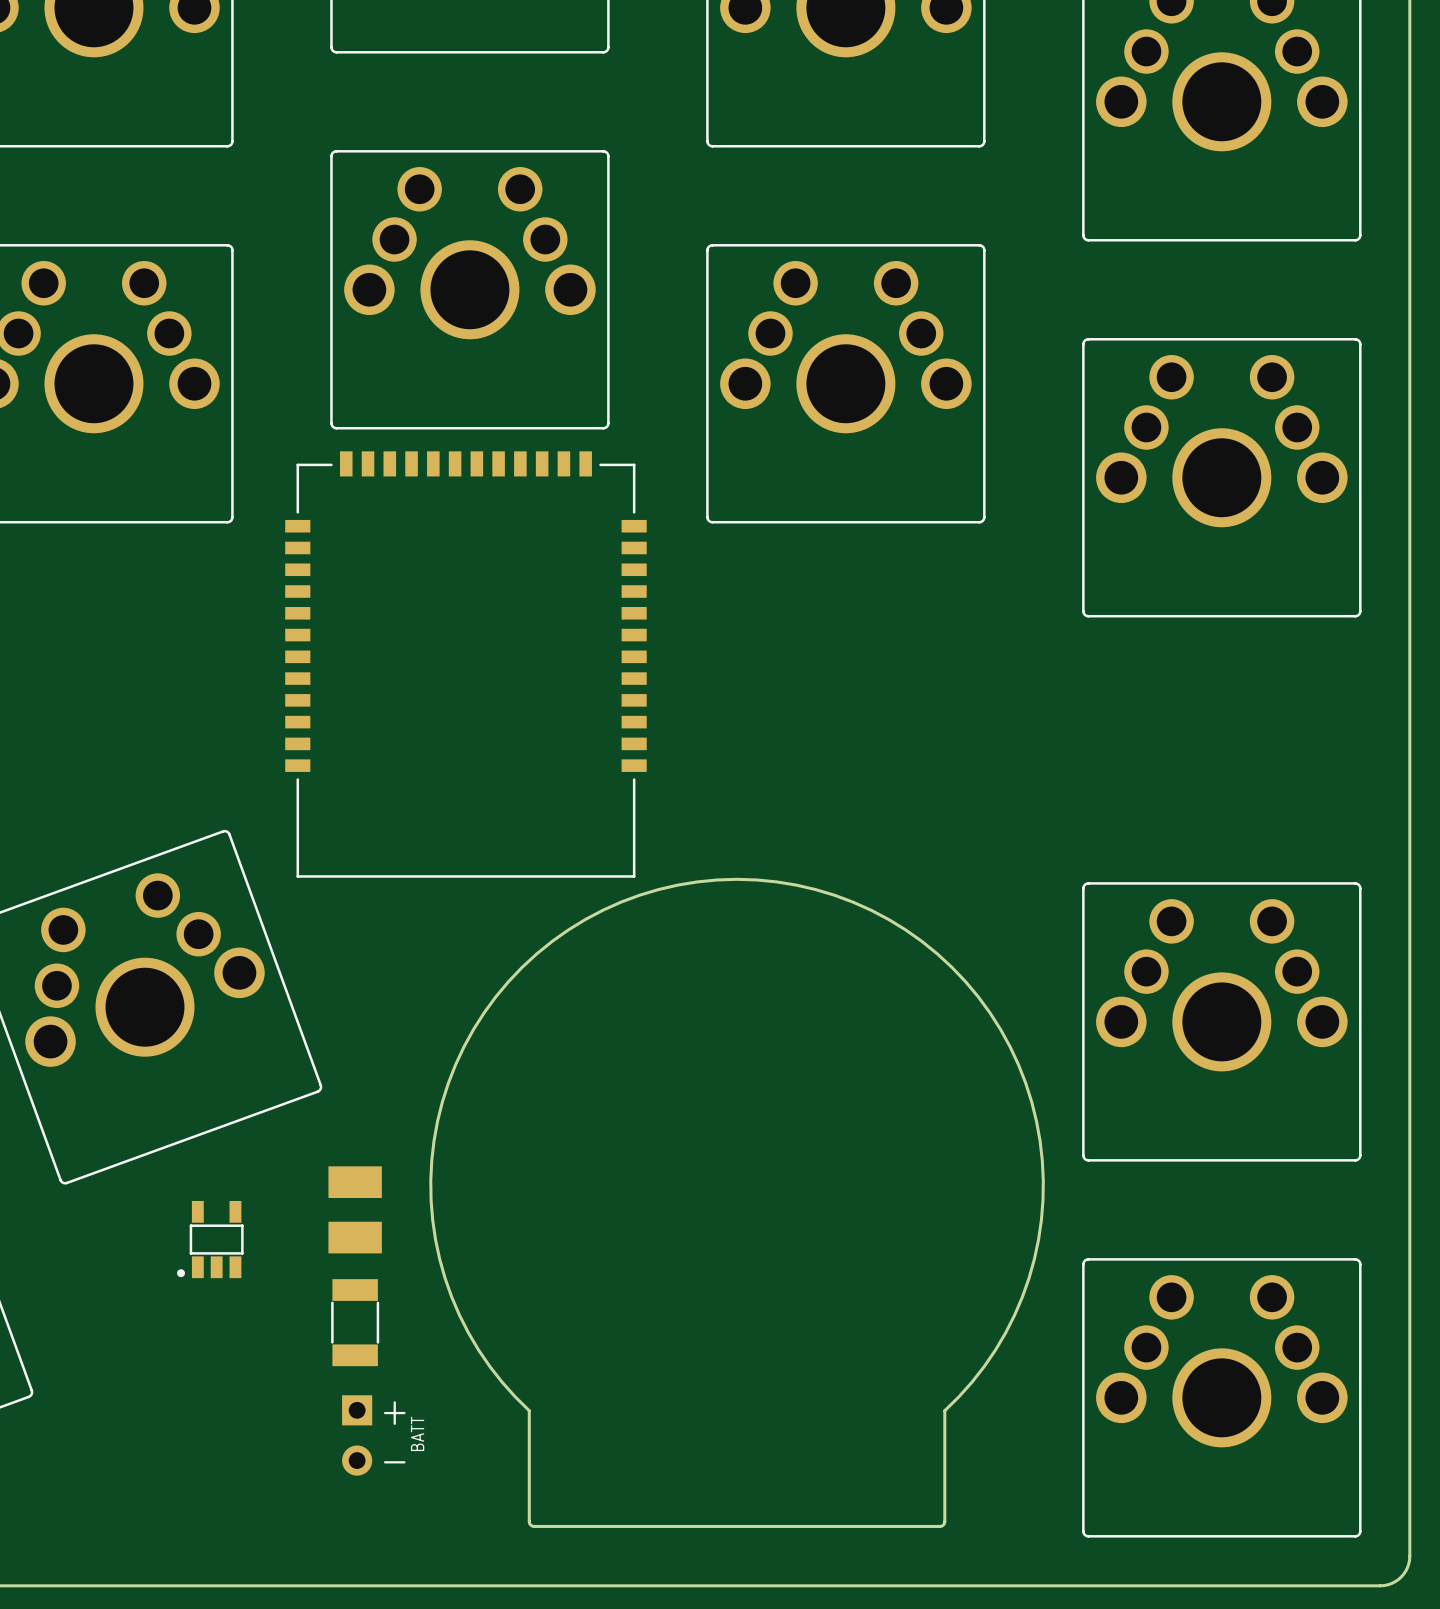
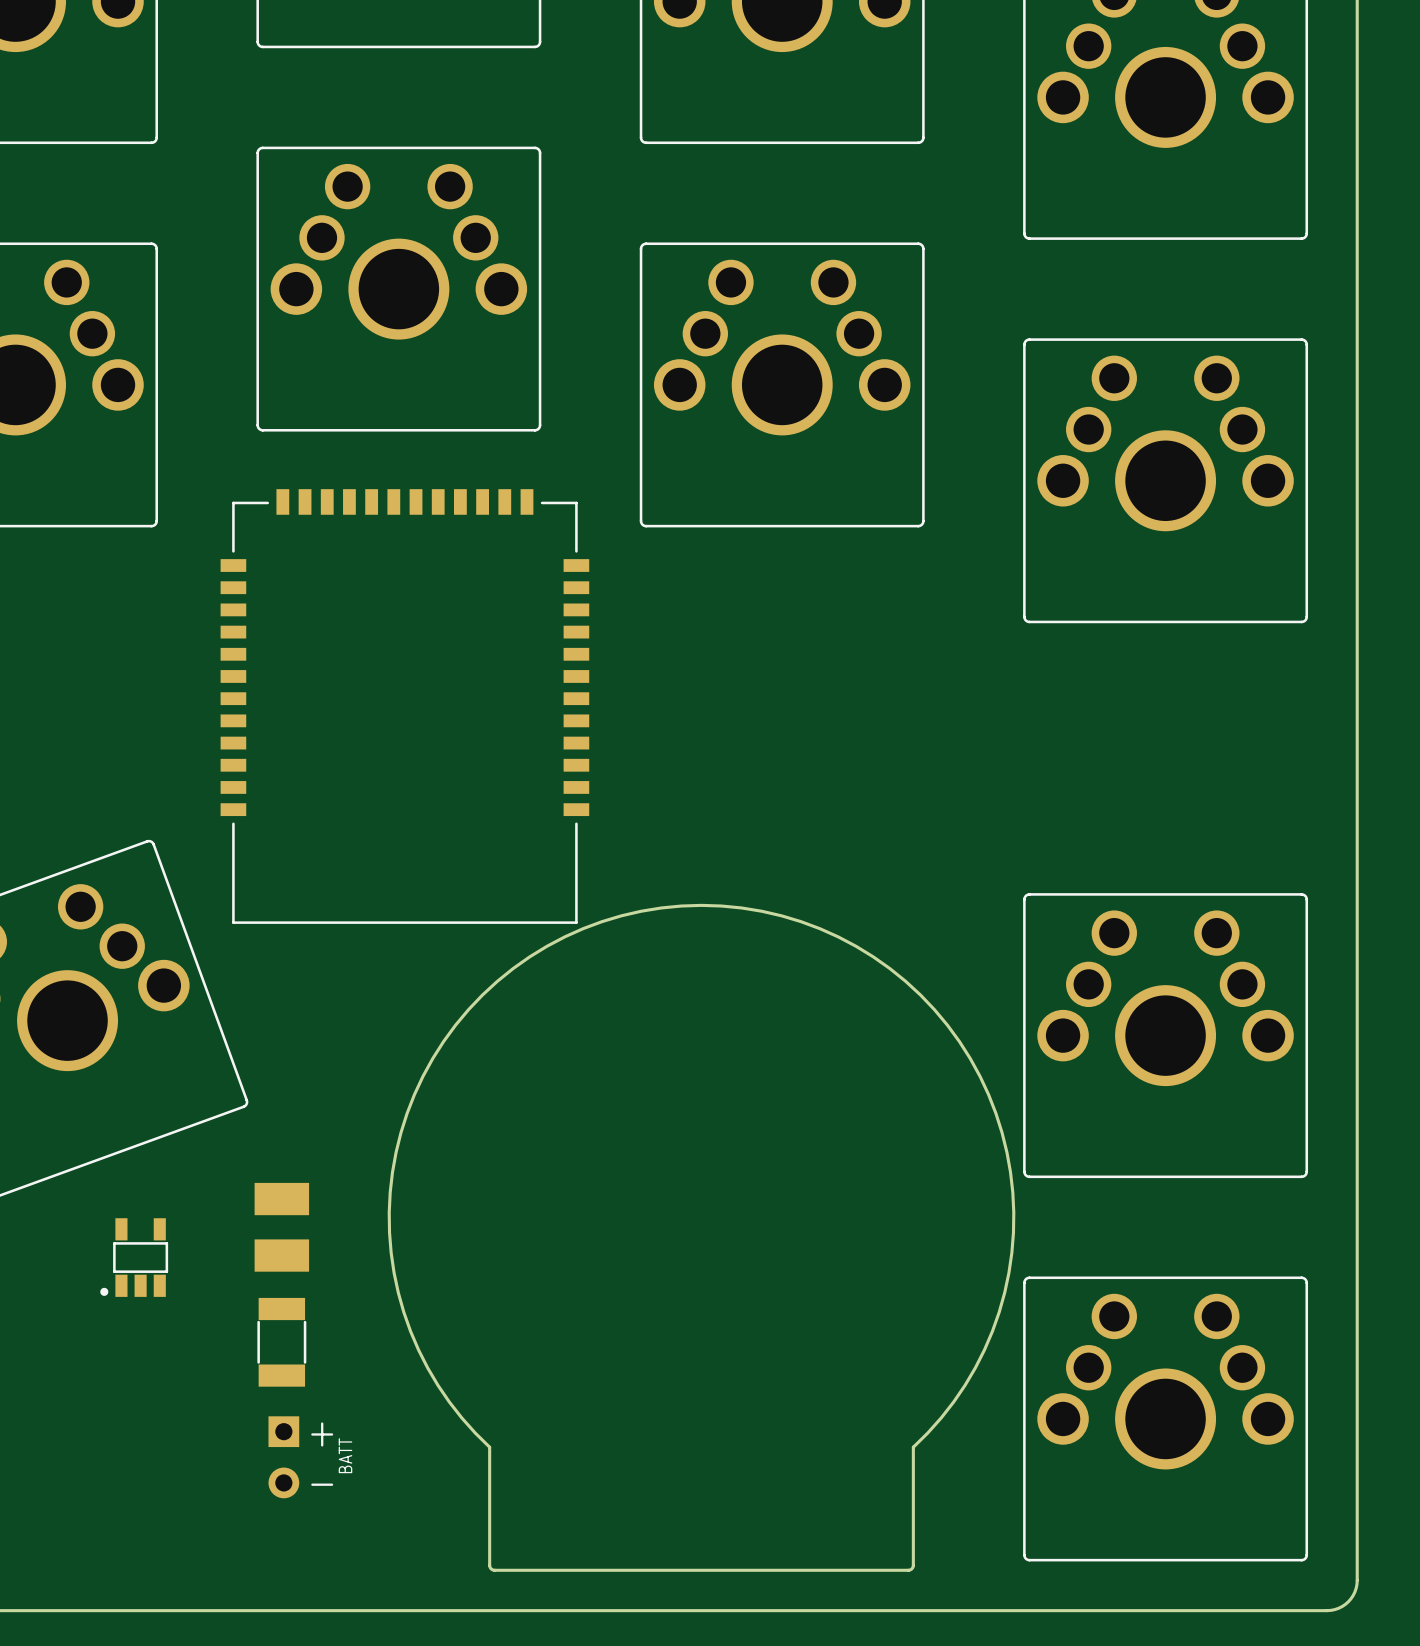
part position: (465, 664) -> (404, 706)
board edge: (944, 1410) (944, 1521) (941, 1526) (530, 1525) (529, 1410) (489, 1366) (468, 1332) (451, 1296) (435, 1239) (430, 1180) (437, 1121) (455, 1064) (484, 1012) (522, 967) (568, 929) (621, 902) (677, 885) (737, 879) (796, 885) (853, 902) (905, 929) (951, 967) (989, 1012) (1018, 1064) (1036, 1121) (1043, 1180) (1038, 1239) (1022, 1296) (1005, 1332) (984, 1366) (944, 1410) -> (913, 1447) (953, 1401) (975, 1367) (992, 1331) (1008, 1272) (1013, 1212) (1006, 1152) (988, 1094) (959, 1041) (920, 995) (873, 956) (819, 928) (761, 911) (701, 905) (641, 911) (583, 928) (529, 956) (482, 995) (443, 1041) (414, 1094) (396, 1152) (389, 1212) (394, 1272) (410, 1331) (427, 1367) (449, 1401) (489, 1447) (491, 1568) (909, 1570) (913, 1565) (913, 1447)

